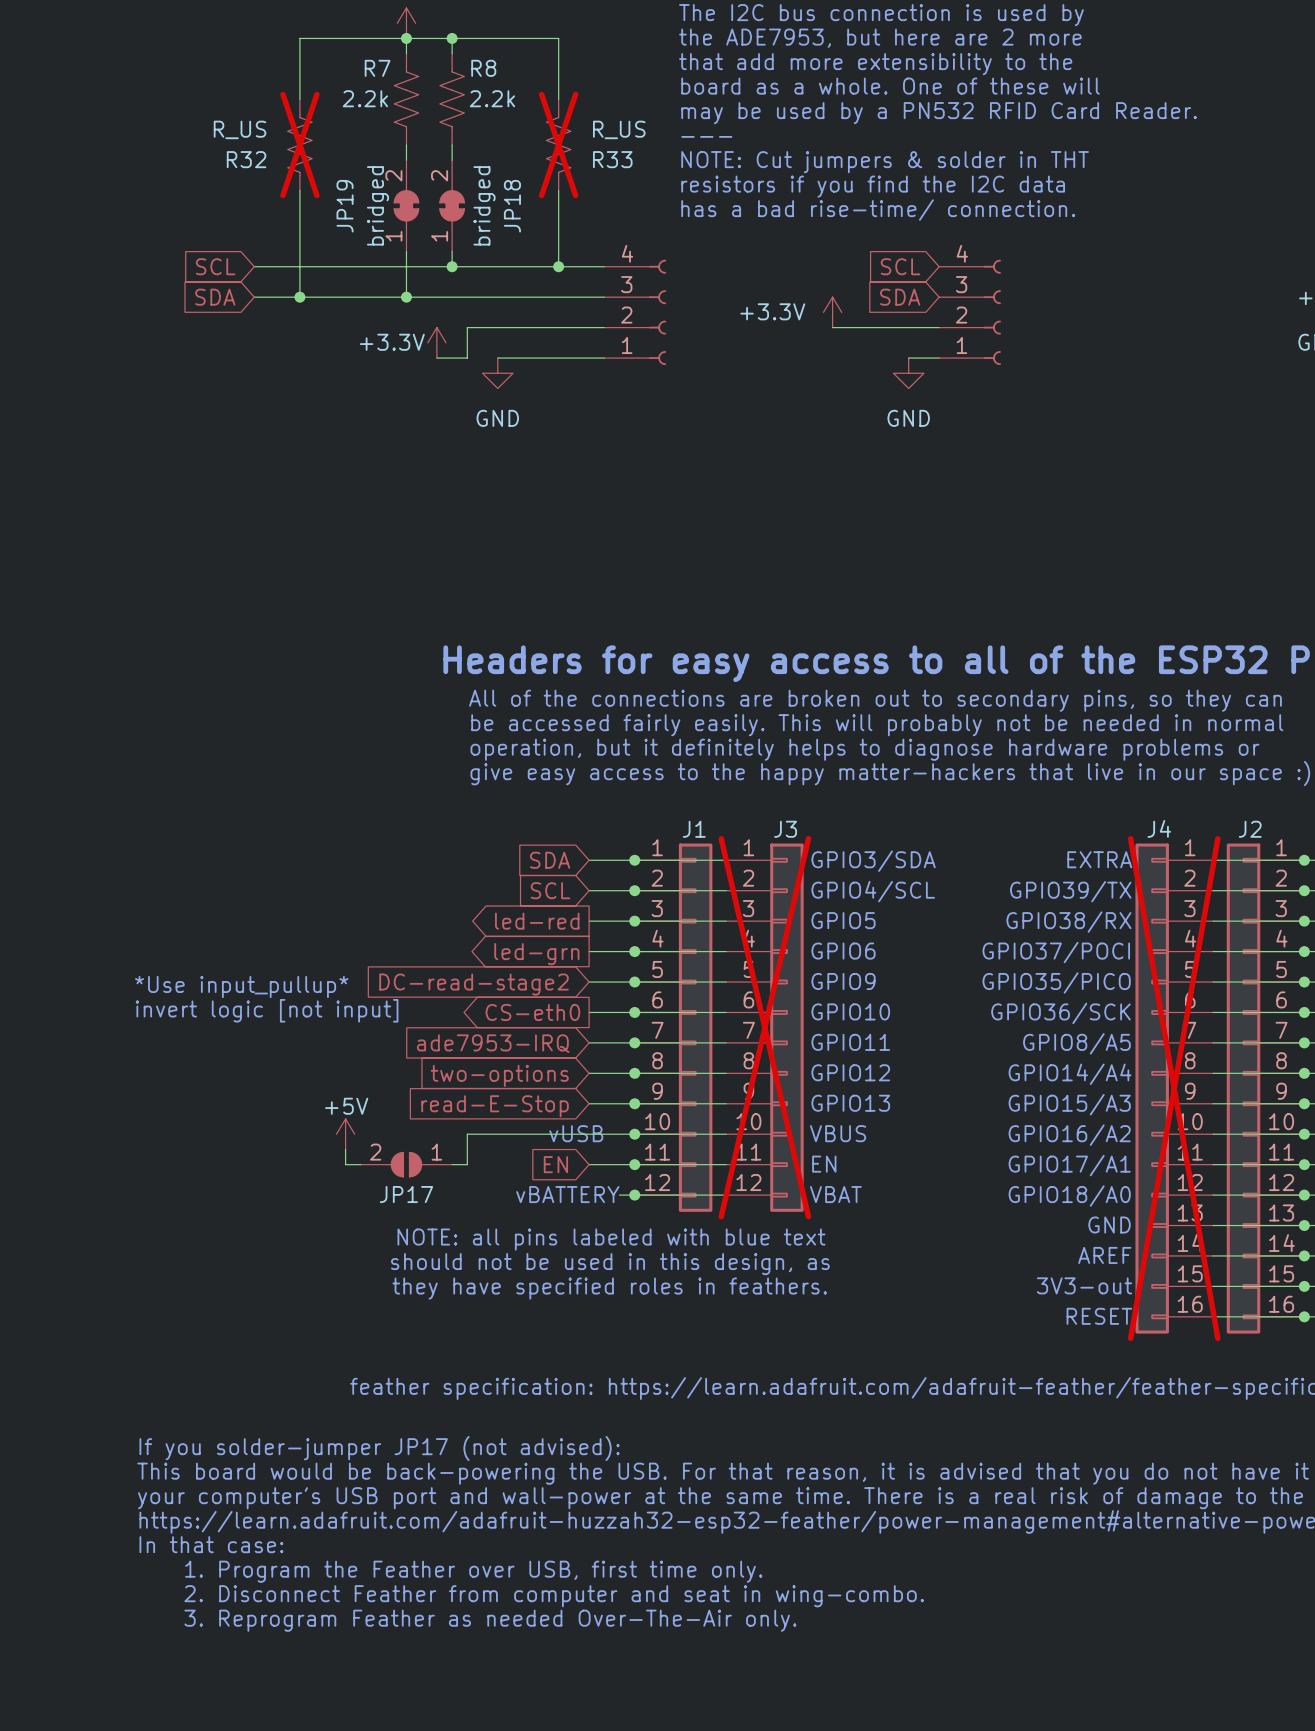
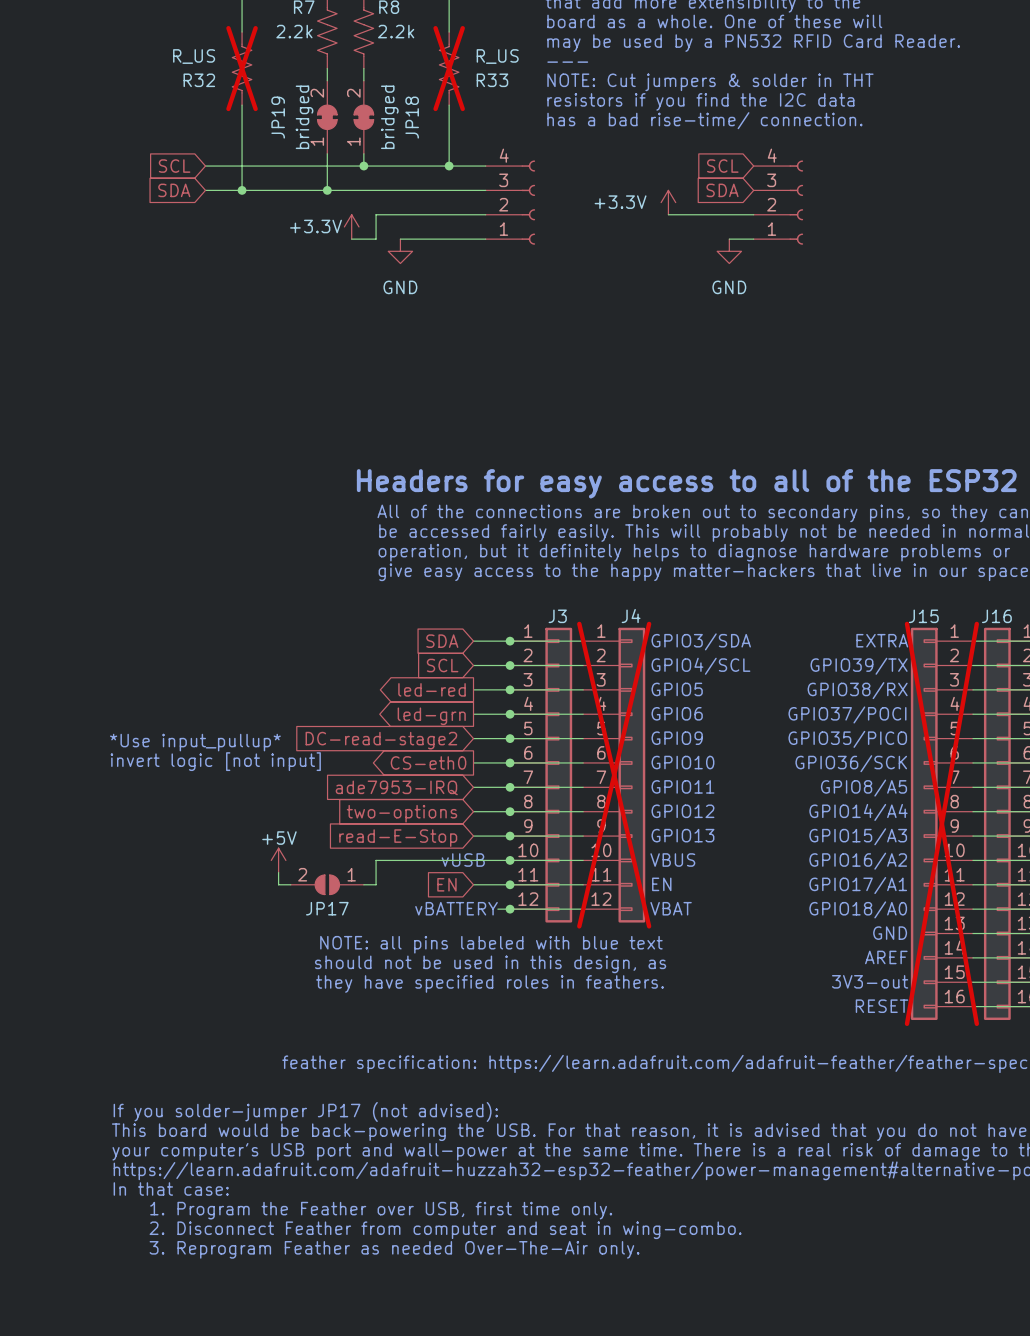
J4 name: J4 (1159, 828) -> J15 (923, 616)
J1 name: J1 (694, 829) -> J3 (557, 616)
J3 name: J3 (785, 829) -> J4 (631, 616)
J2 name: J2 (1250, 829) -> J16 (996, 616)

